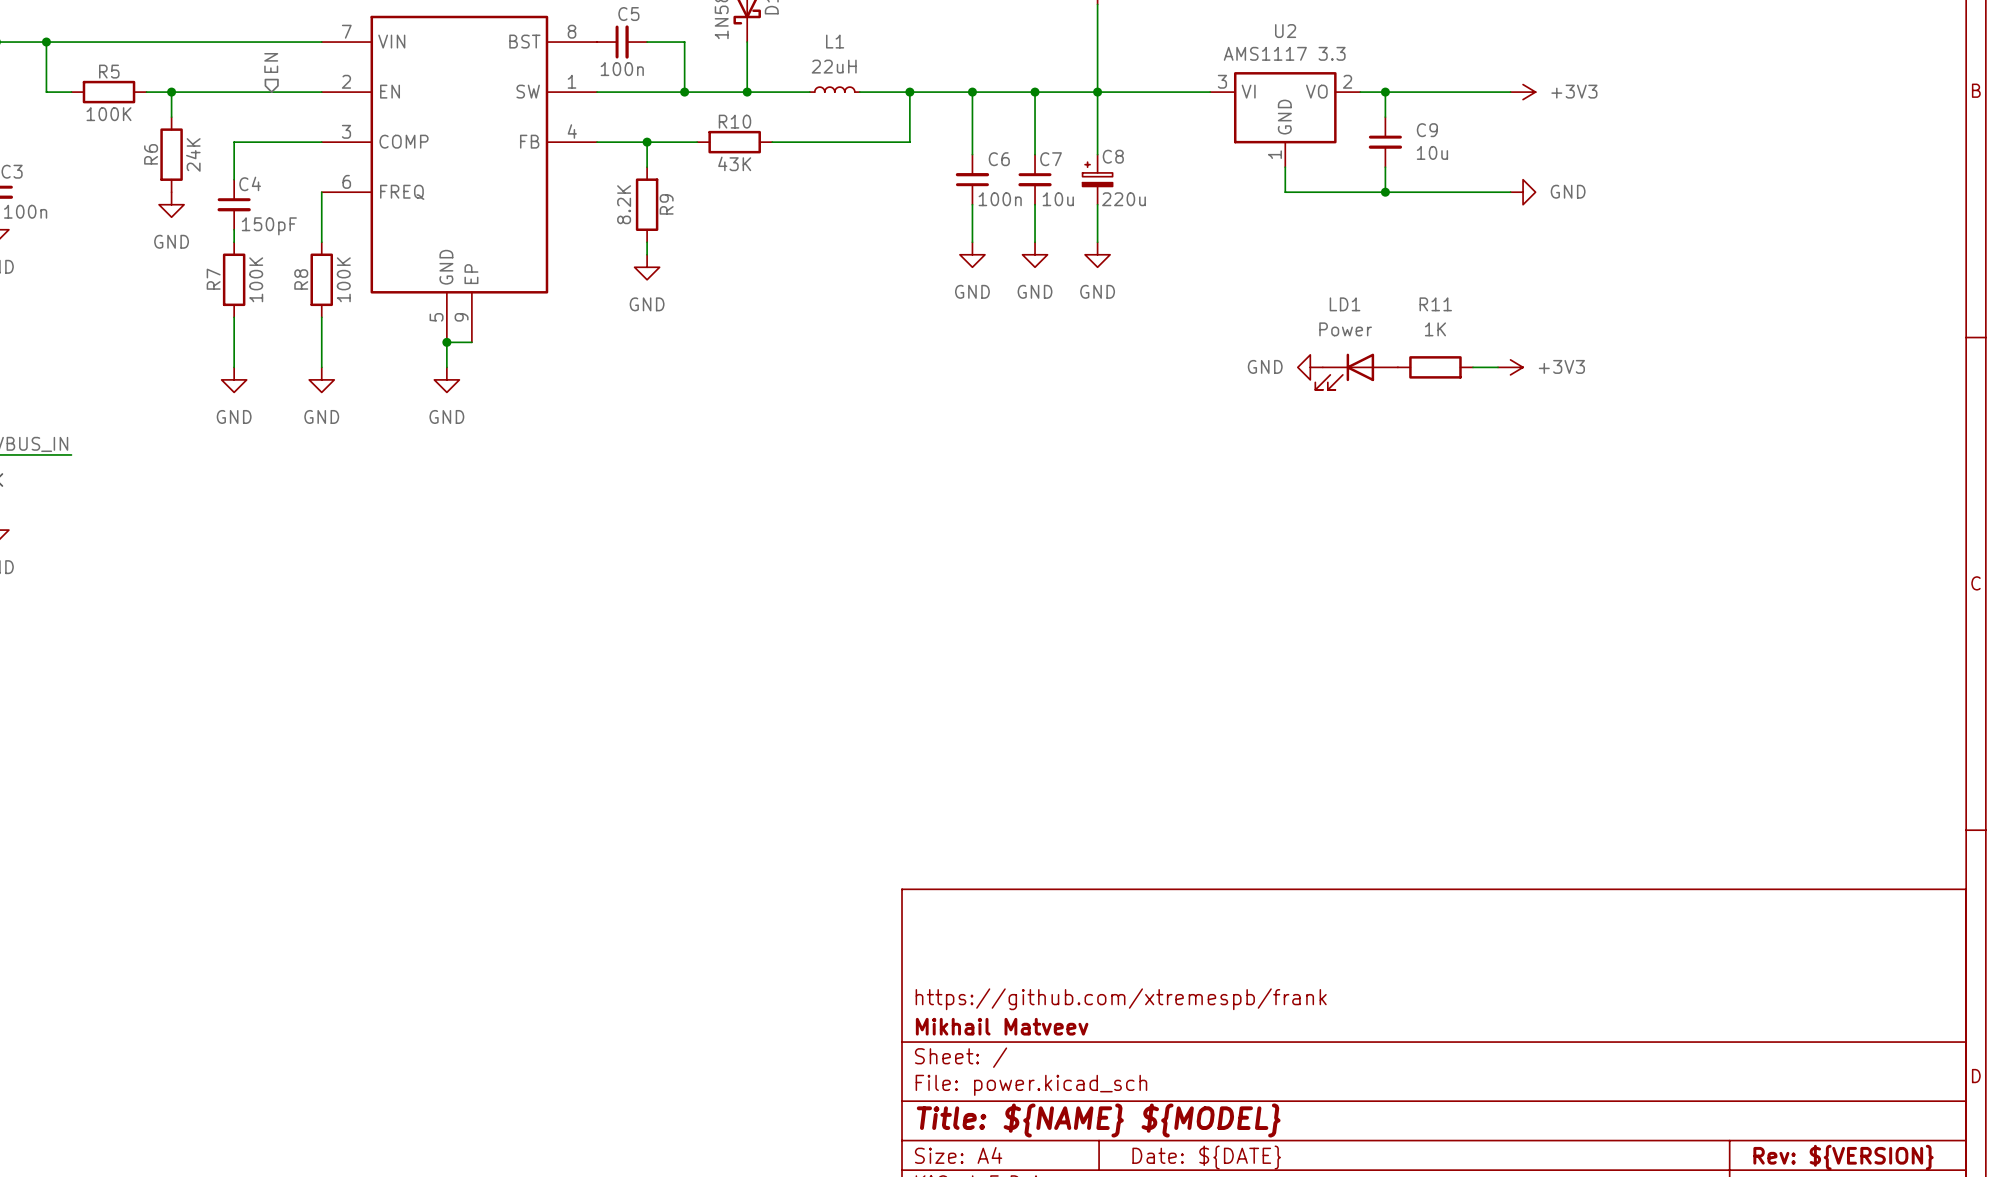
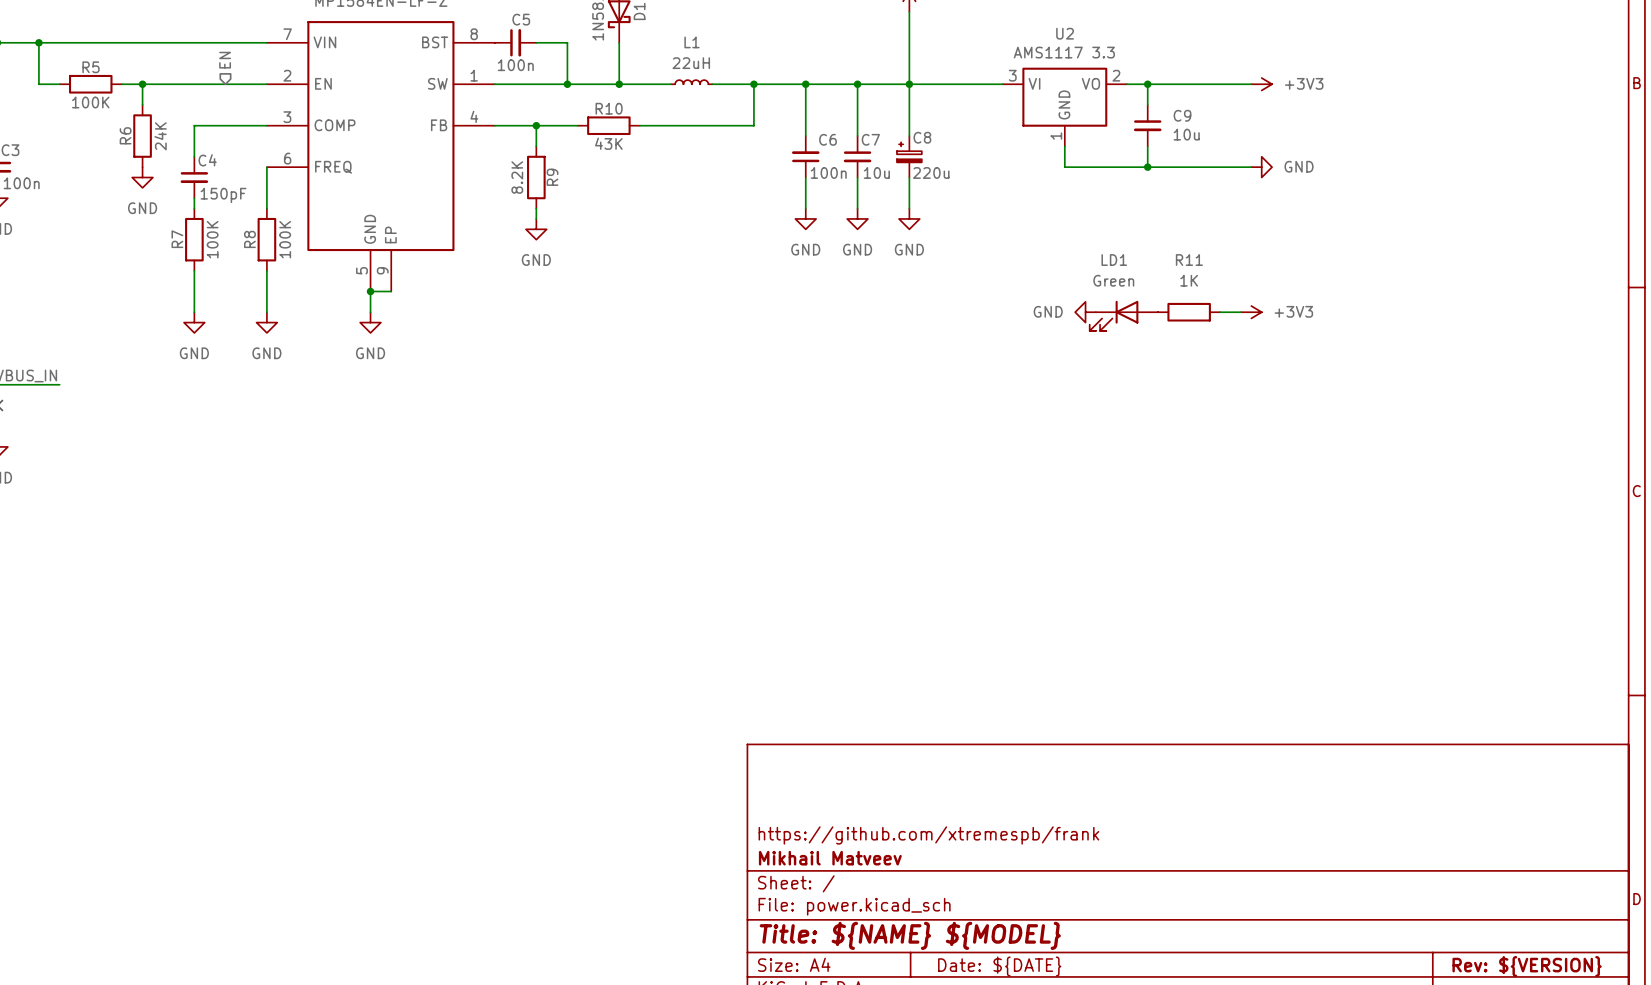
LD1 value: Power (1345, 329) -> Green (1113, 280)

